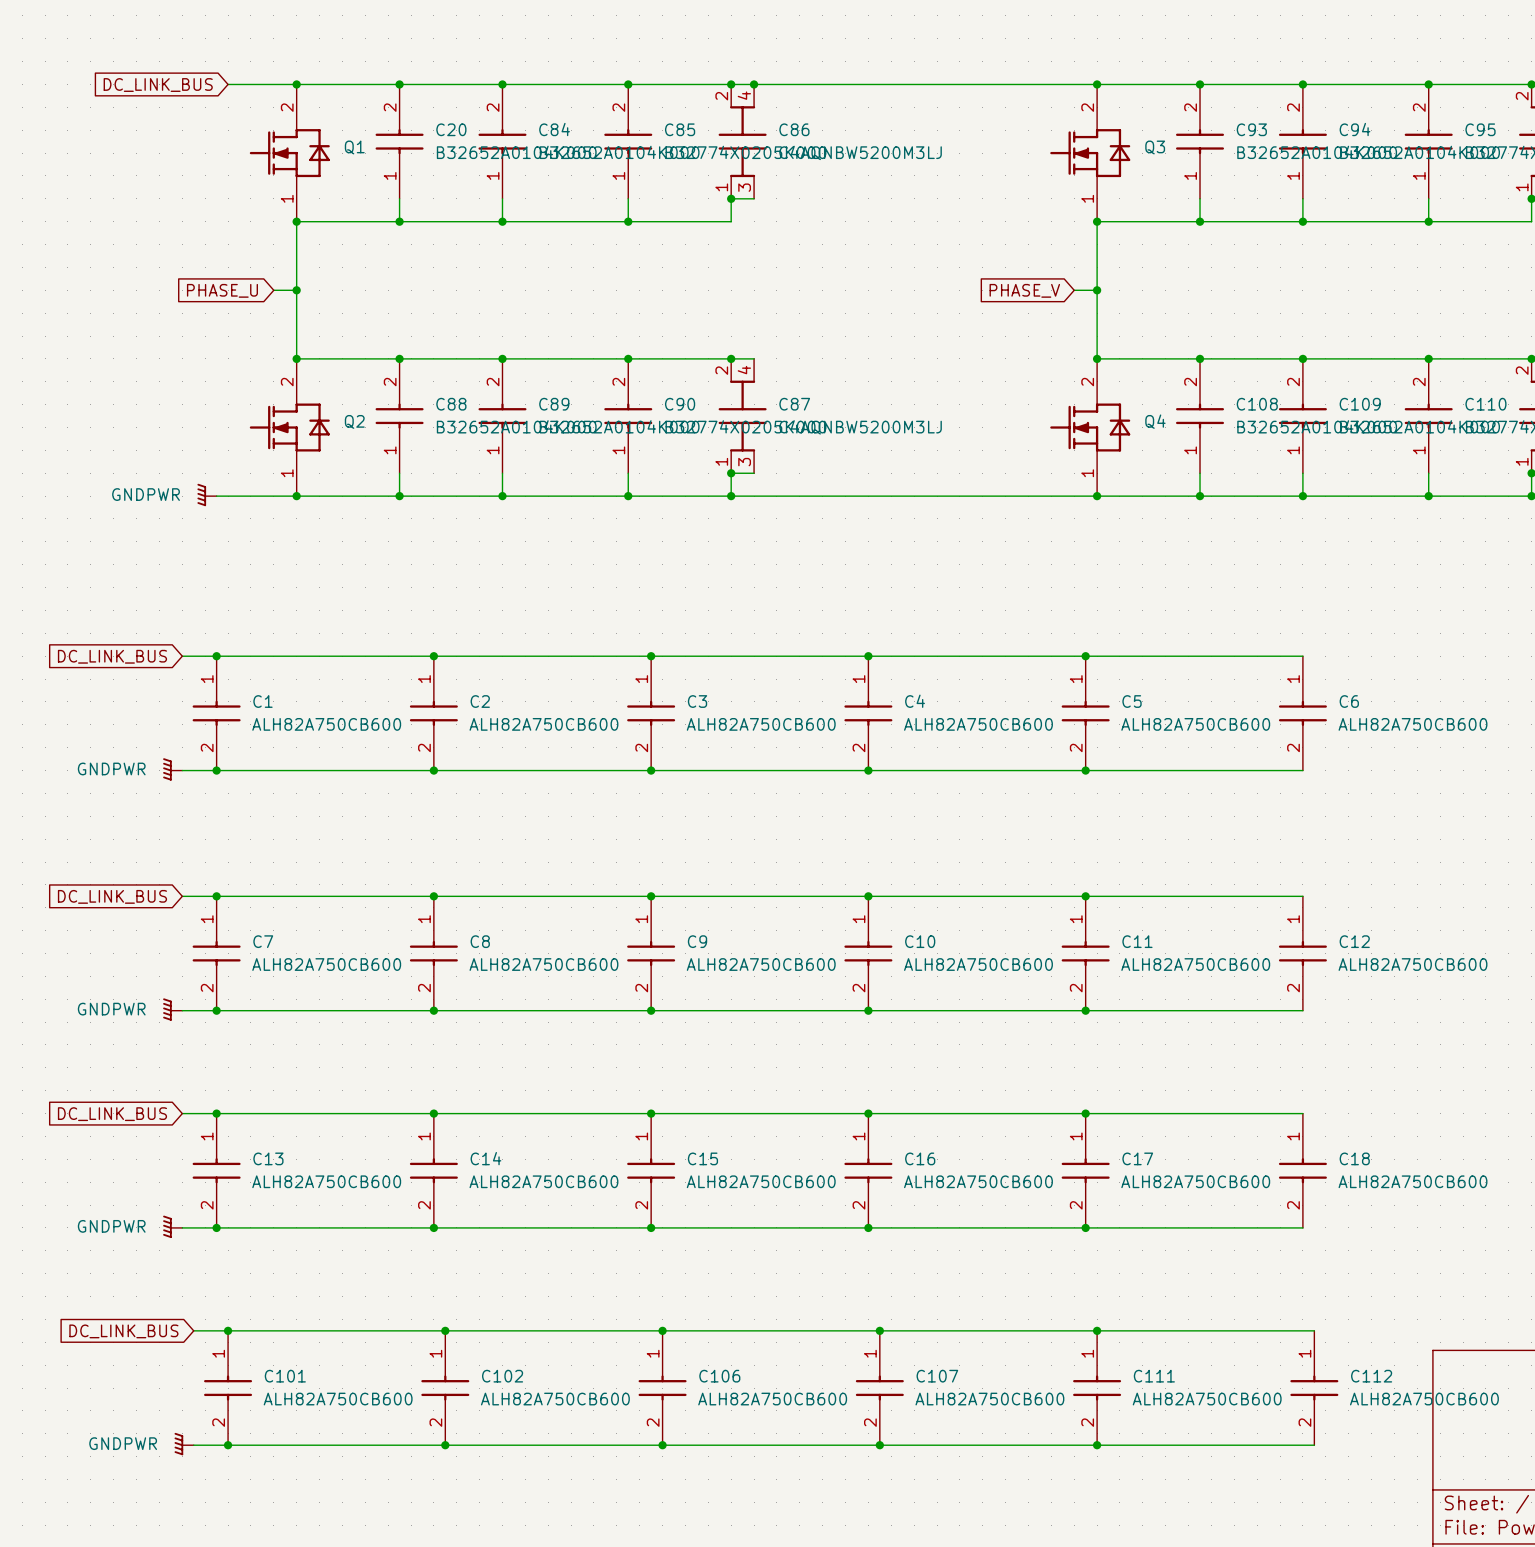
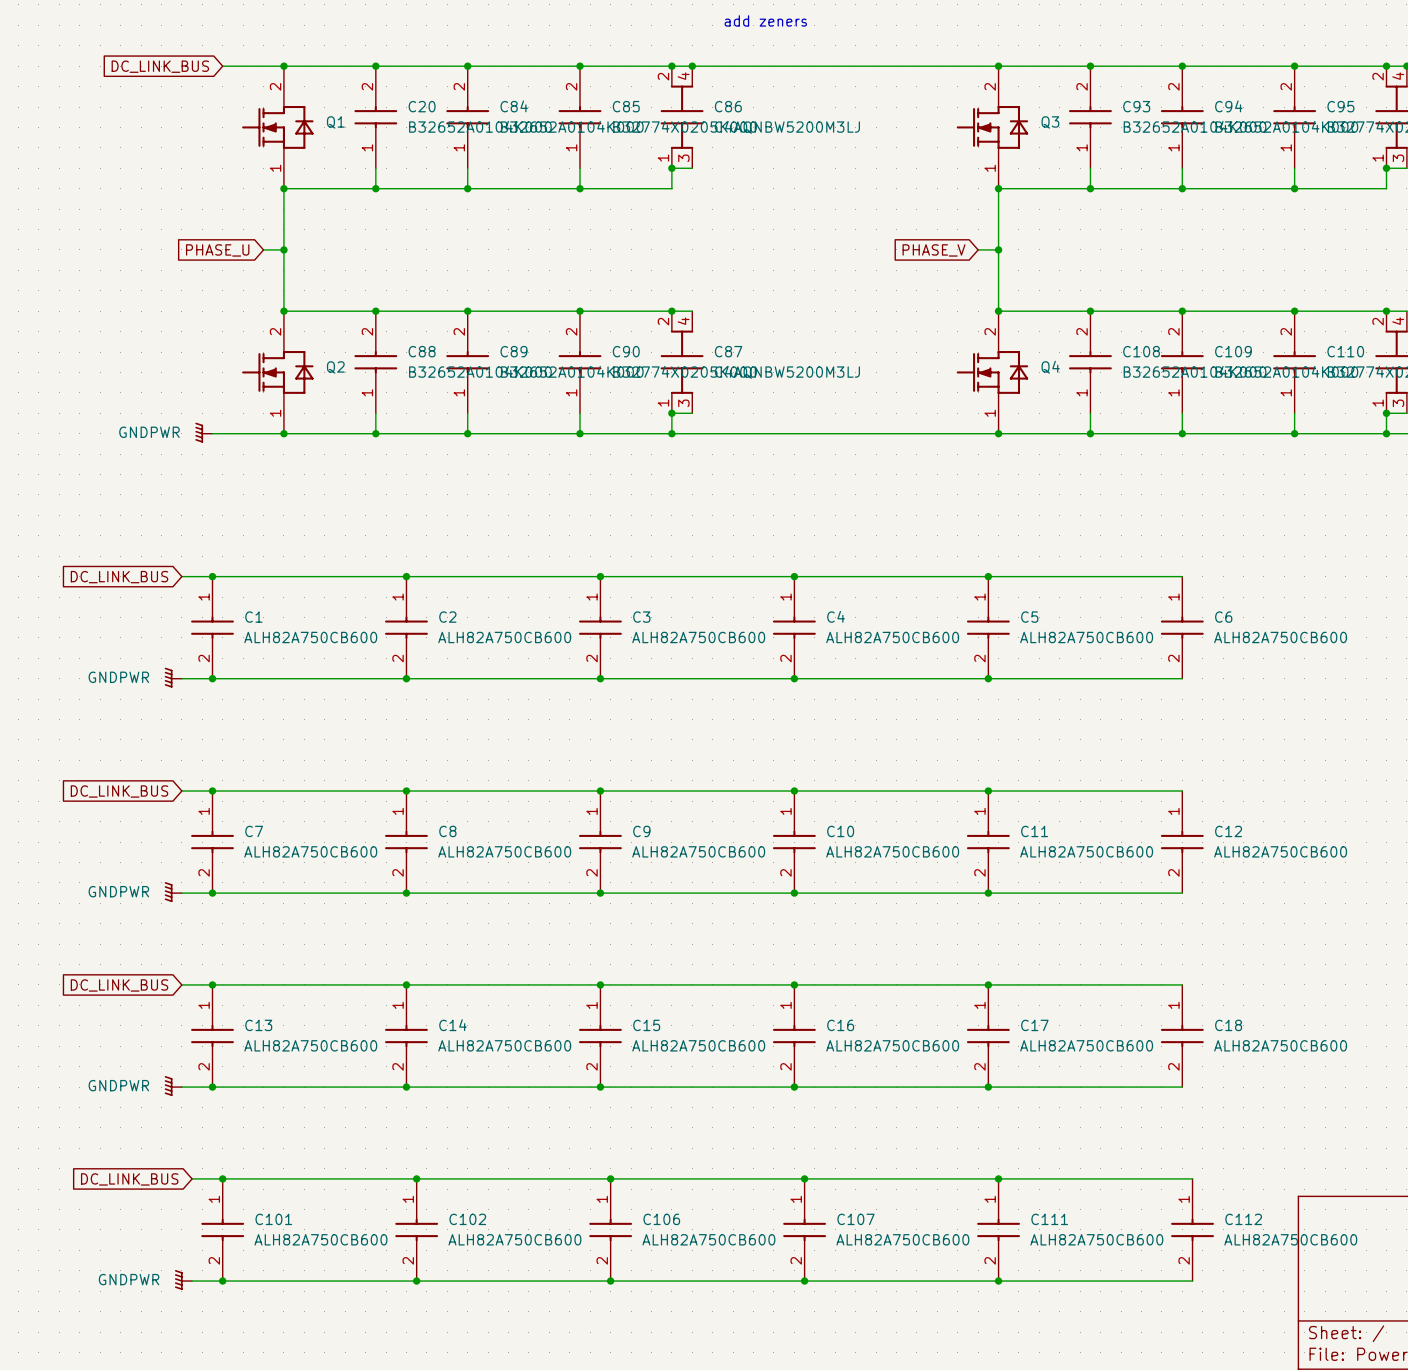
text: none -> add zeners (765, 20)

